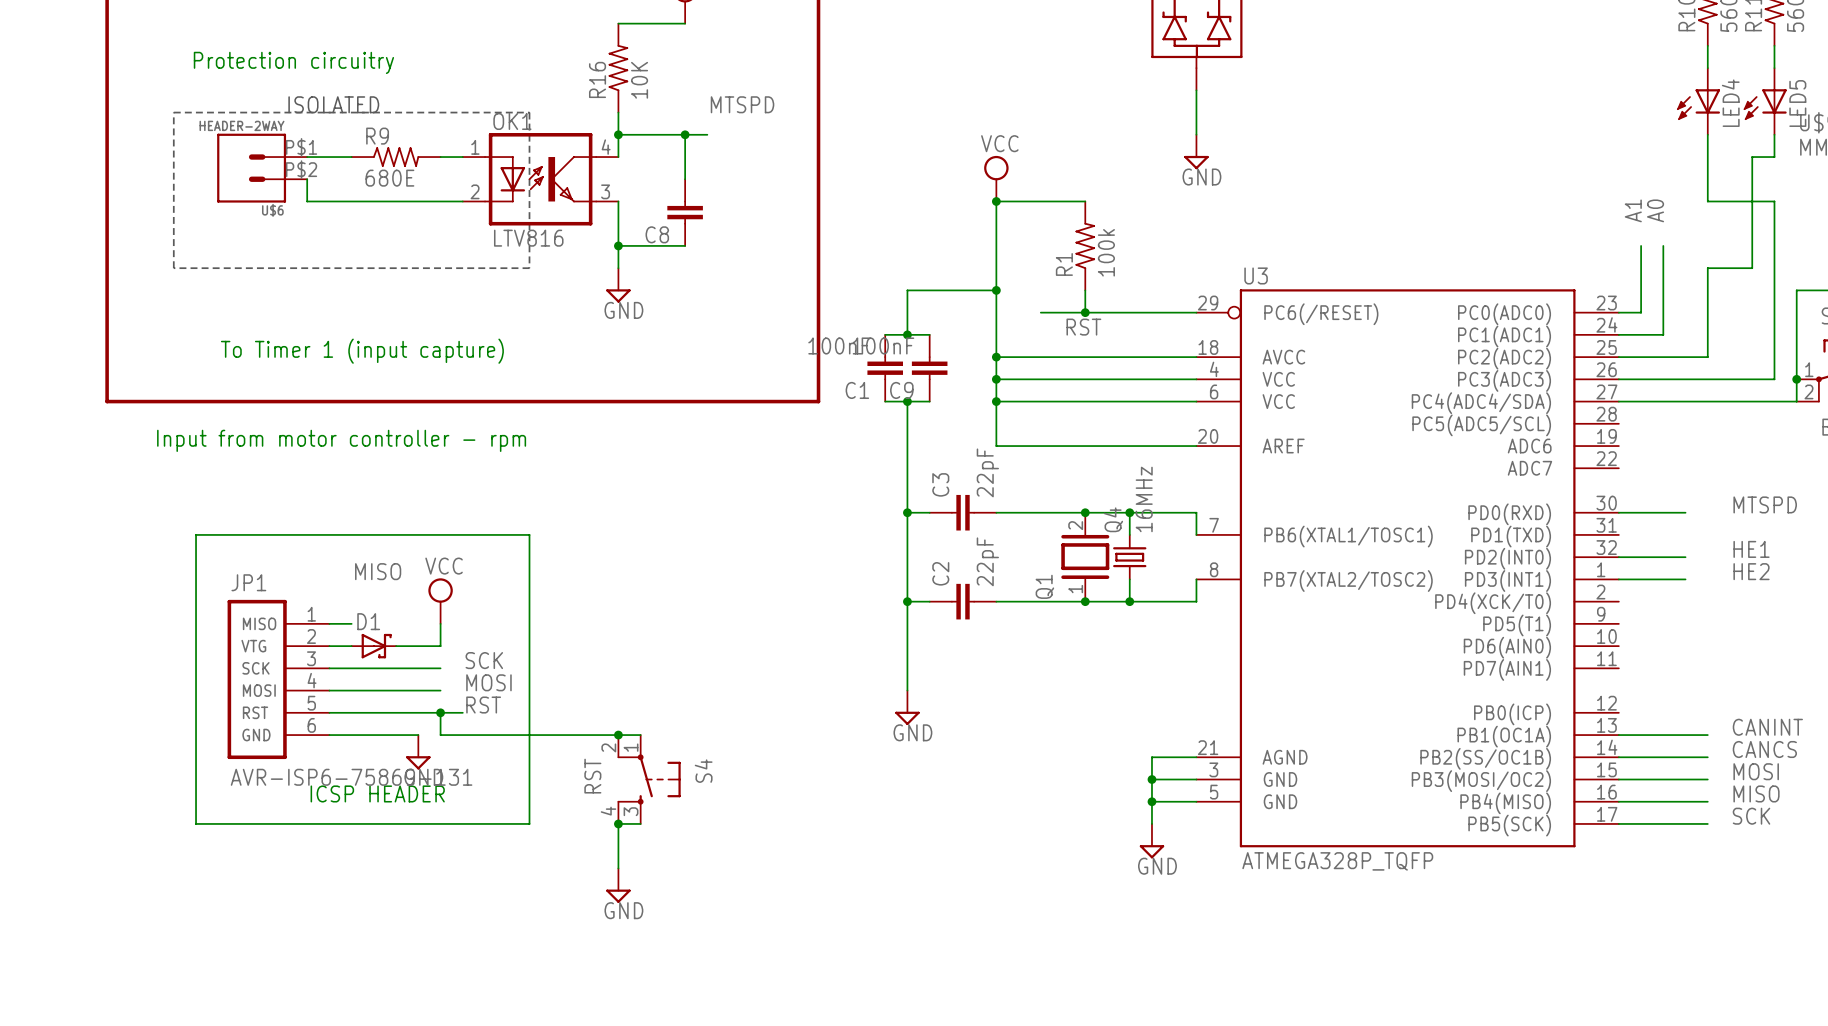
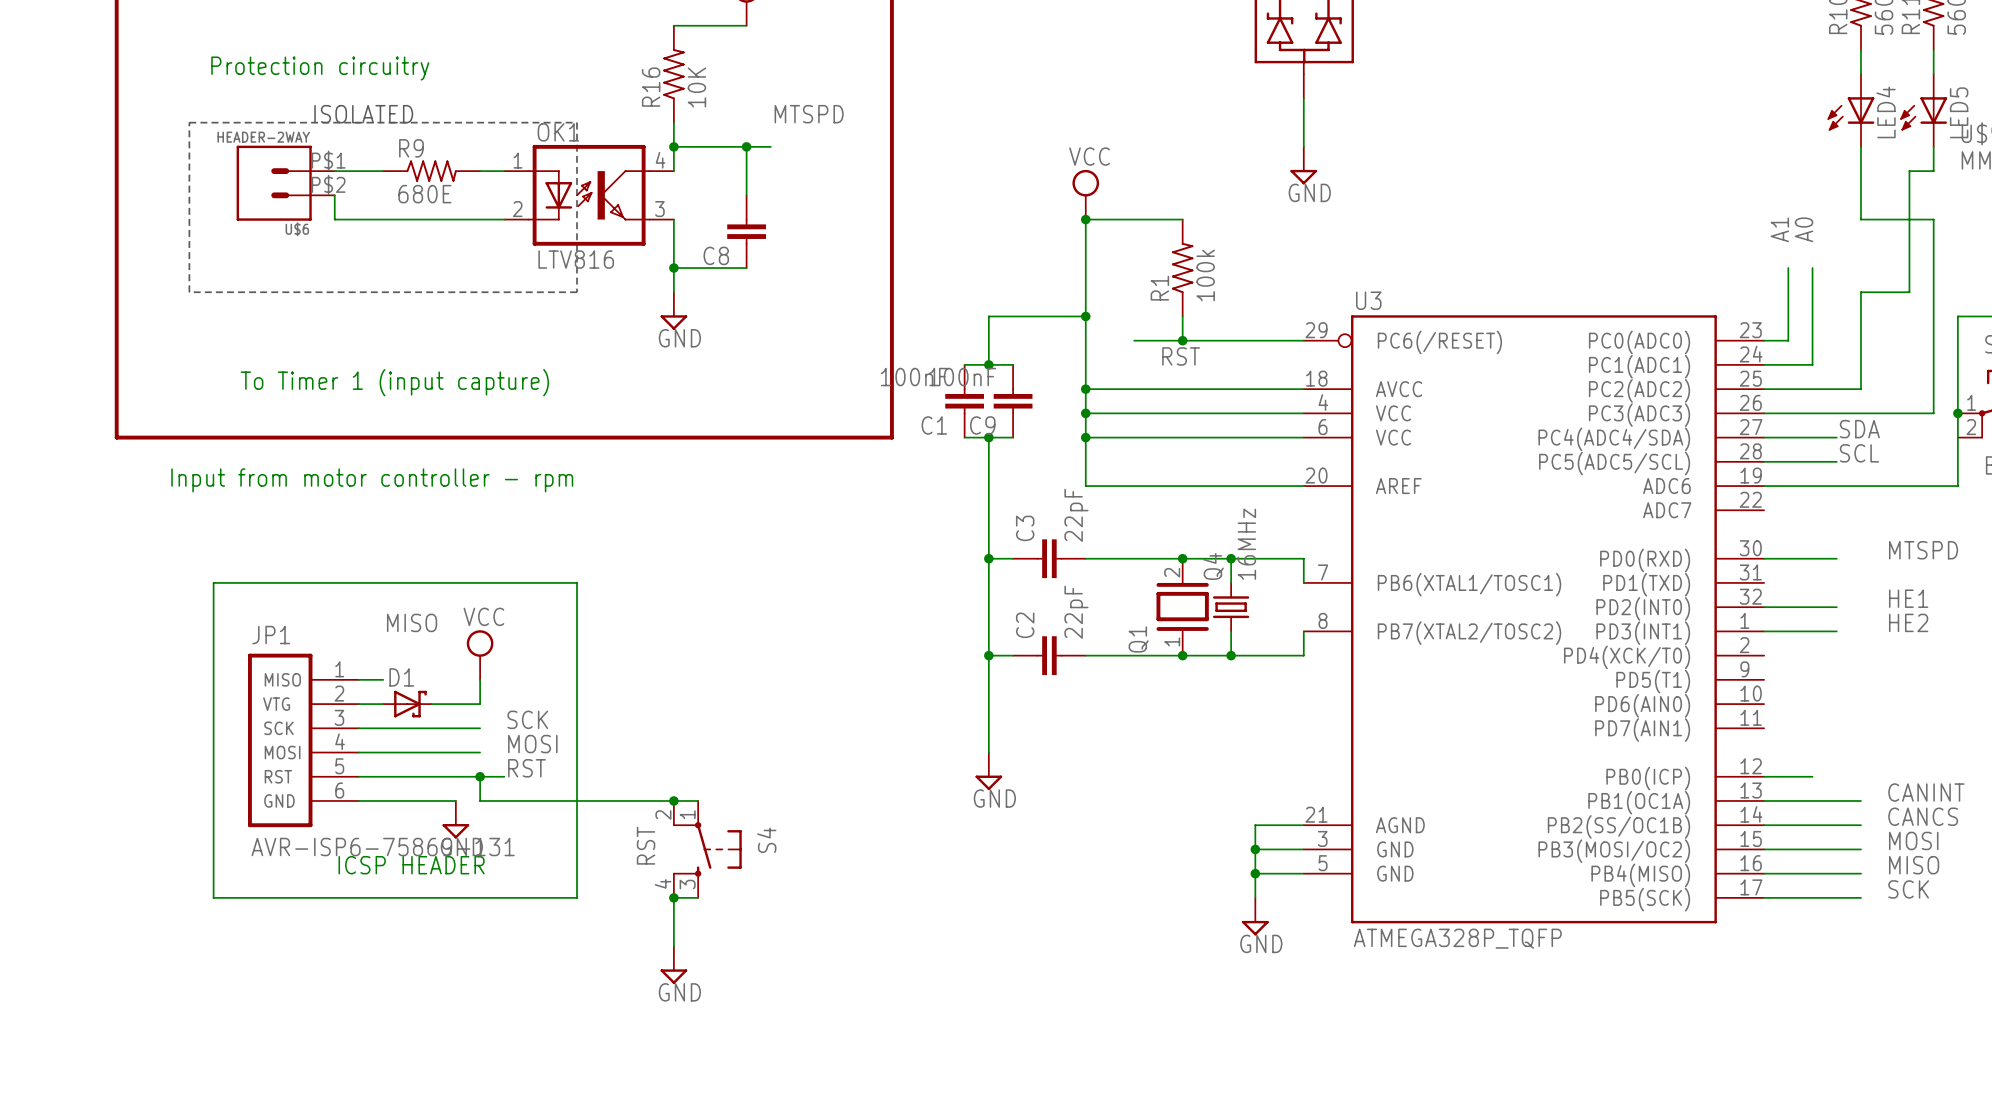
label: none -> SDA (1859, 429)
wire: (1685, 401) (1796, 401) -> (1764, 486) (1957, 486) (1957, 437)
label: none -> SCL (1859, 453)
wire: none -> (1764, 461) (1836, 461)
wire: none -> (1764, 776) (1812, 776)

